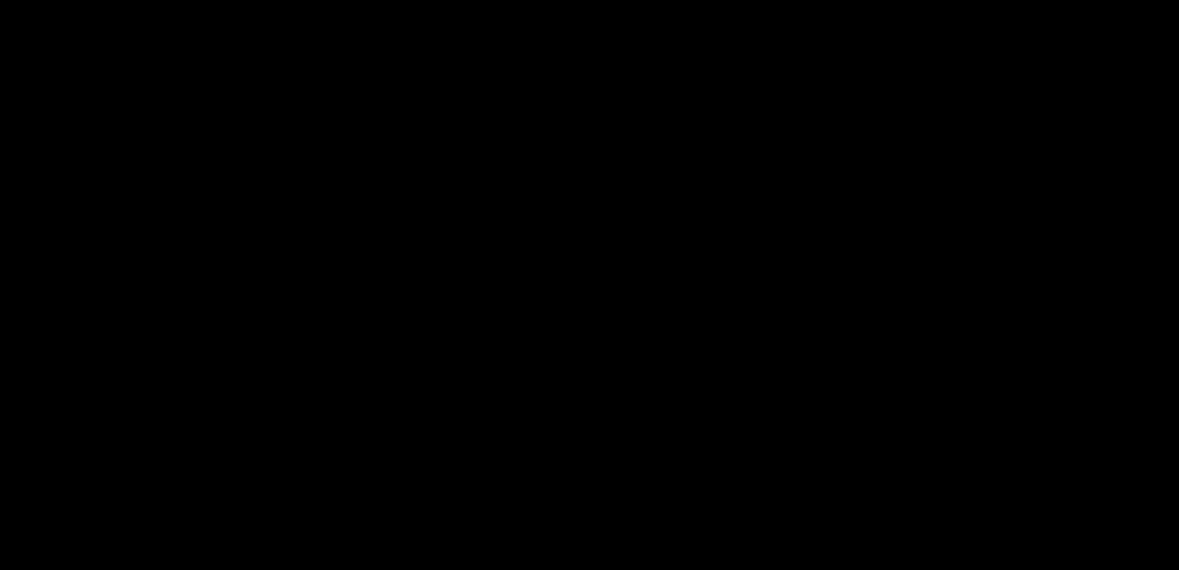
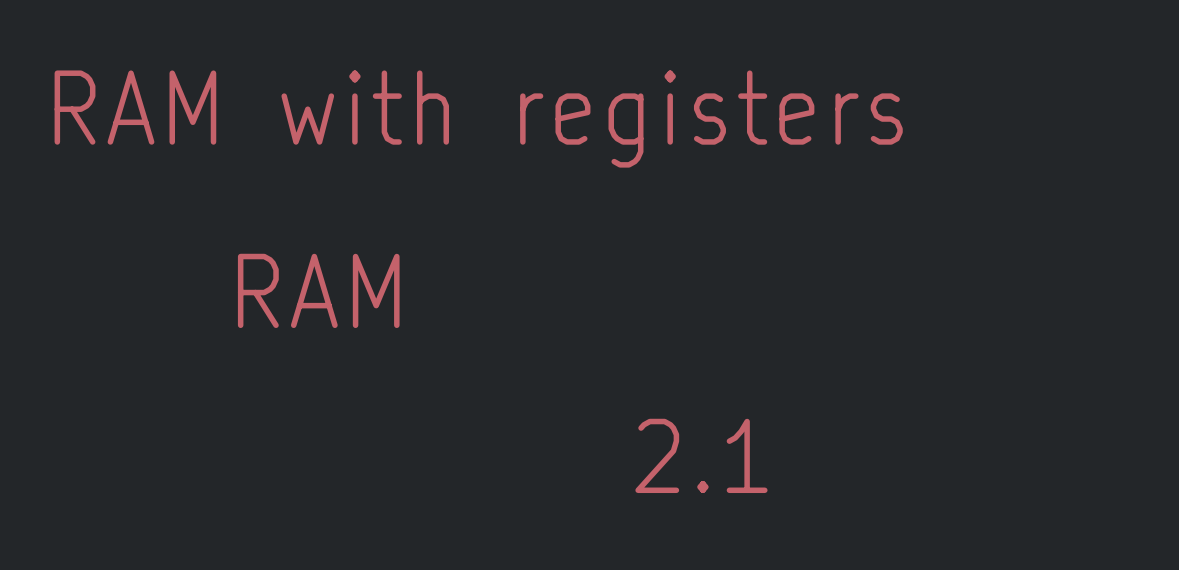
text: none -> RAM with registers (478, 119)
text: none -> RAM (318, 290)
text: none -> 2.1 (701, 455)

